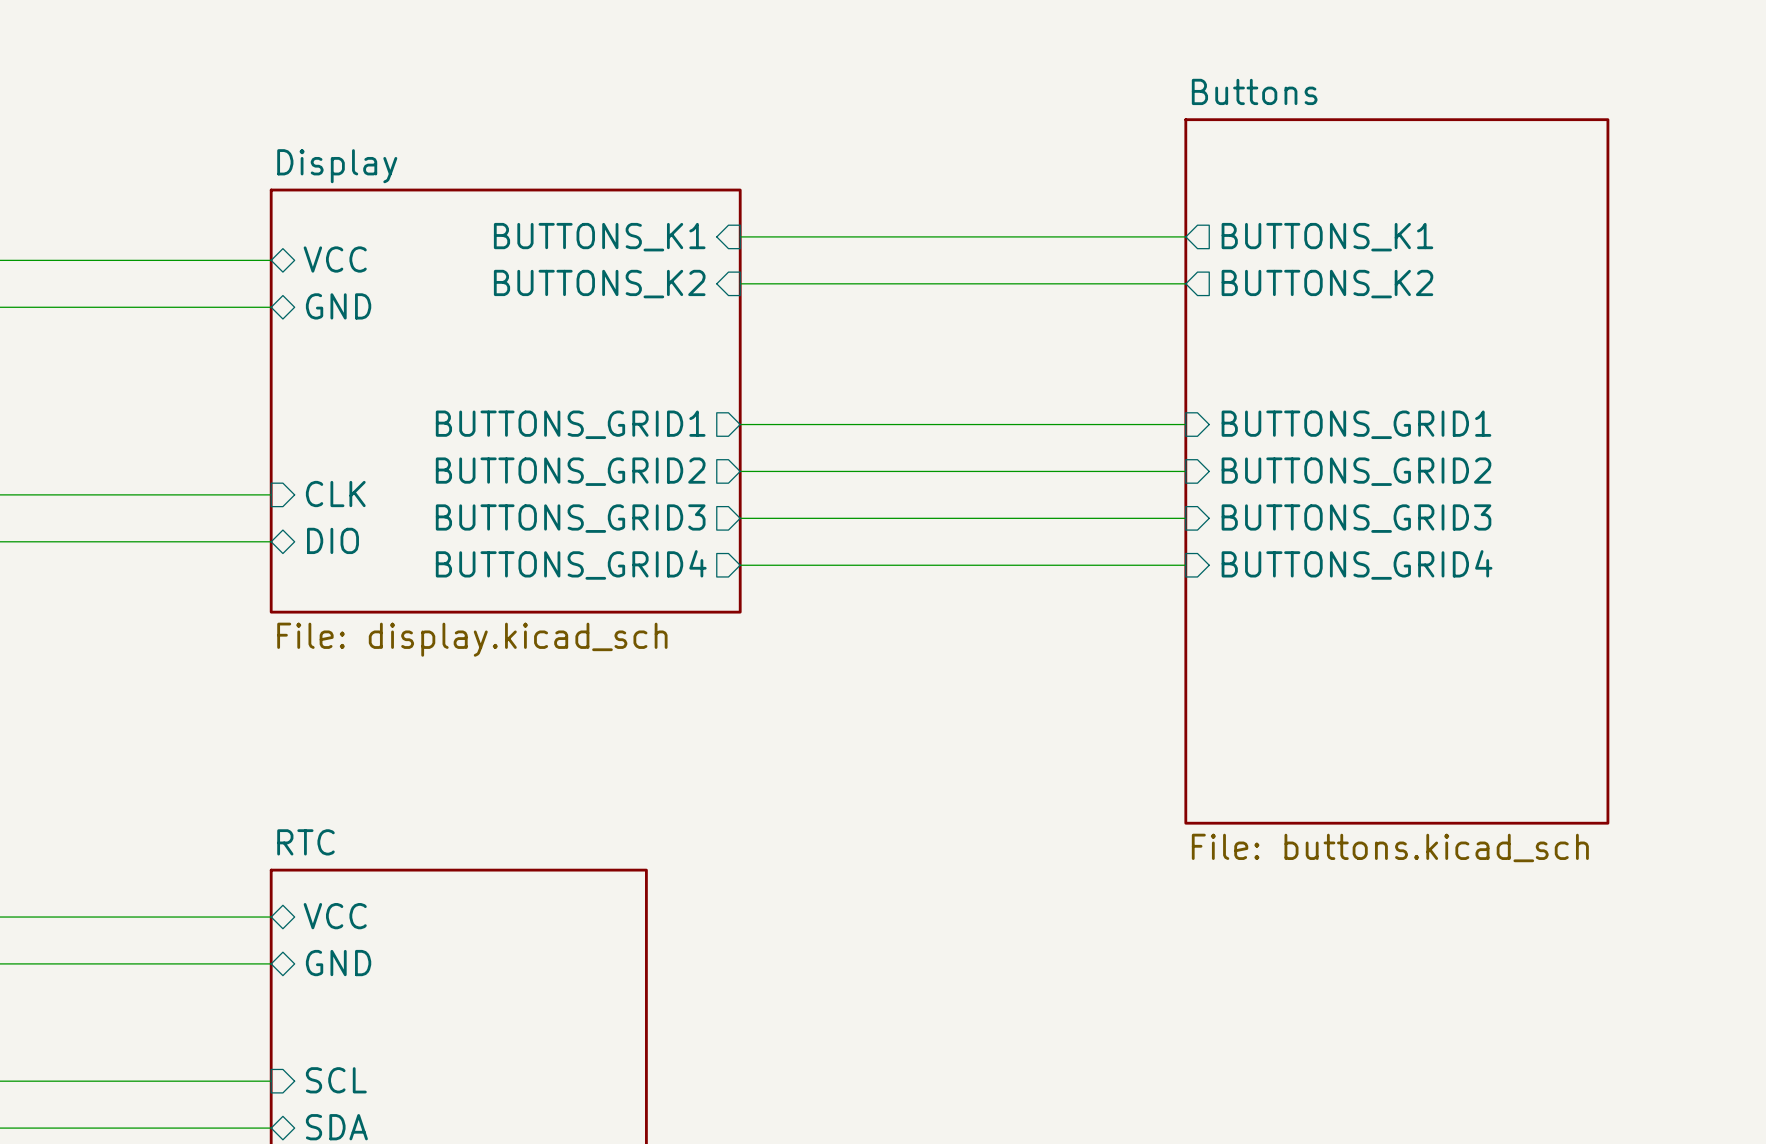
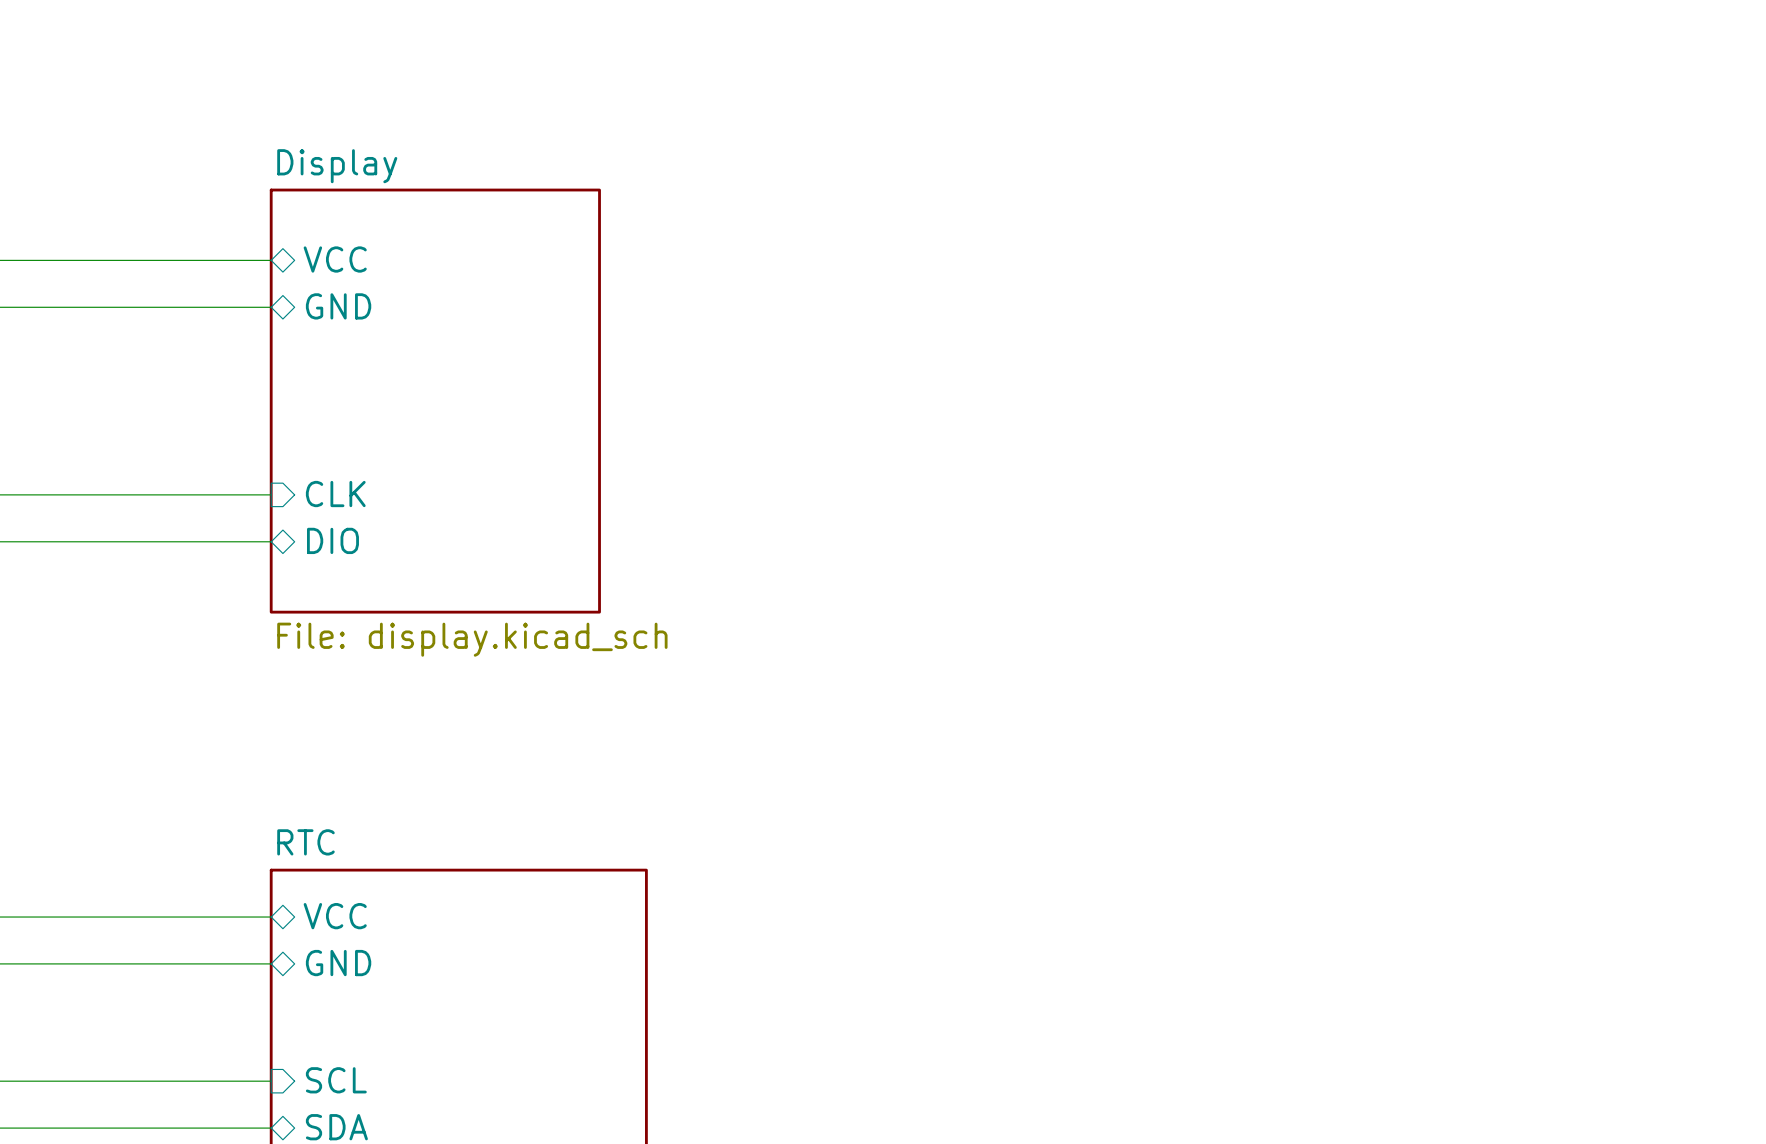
wire: (740, 236) (1185, 236) -> none
sheet pin: BUTTONS_K1 (599, 237) -> none
sheet pin: BUTTONS_K1 (1327, 237) -> none
wire: (740, 283) (1185, 283) -> none
sheet pin: BUTTONS_K2 (599, 284) -> none
sheet pin: BUTTONS_K2 (1327, 284) -> none
sheet Display: none -> File: display.kicad_sch (435, 401)
sheet Display: File: display.kicad_sch (505, 401) -> none
sheet pin: BUTTONS_GRID1 (570, 424) -> none
wire: (740, 424) (1185, 424) -> none
sheet pin: BUTTONS_GRID1 (1356, 424) -> none
sheet pin: BUTTONS_GRID2 (570, 471) -> none
wire: (740, 471) (1185, 471) -> none
sheet pin: BUTTONS_GRID2 (1356, 471) -> none
sheet Buttons: File: buttons.kicad_sch (1396, 471) -> none
sheet pin: BUTTONS_GRID3 (570, 518) -> none
wire: (740, 518) (1185, 518) -> none
sheet pin: BUTTONS_GRID3 (1356, 518) -> none
sheet pin: BUTTONS_GRID4 (571, 564) -> none
sheet pin: BUTTONS_GRID4 (1357, 564) -> none
wire: (740, 565) (1185, 565) -> none

